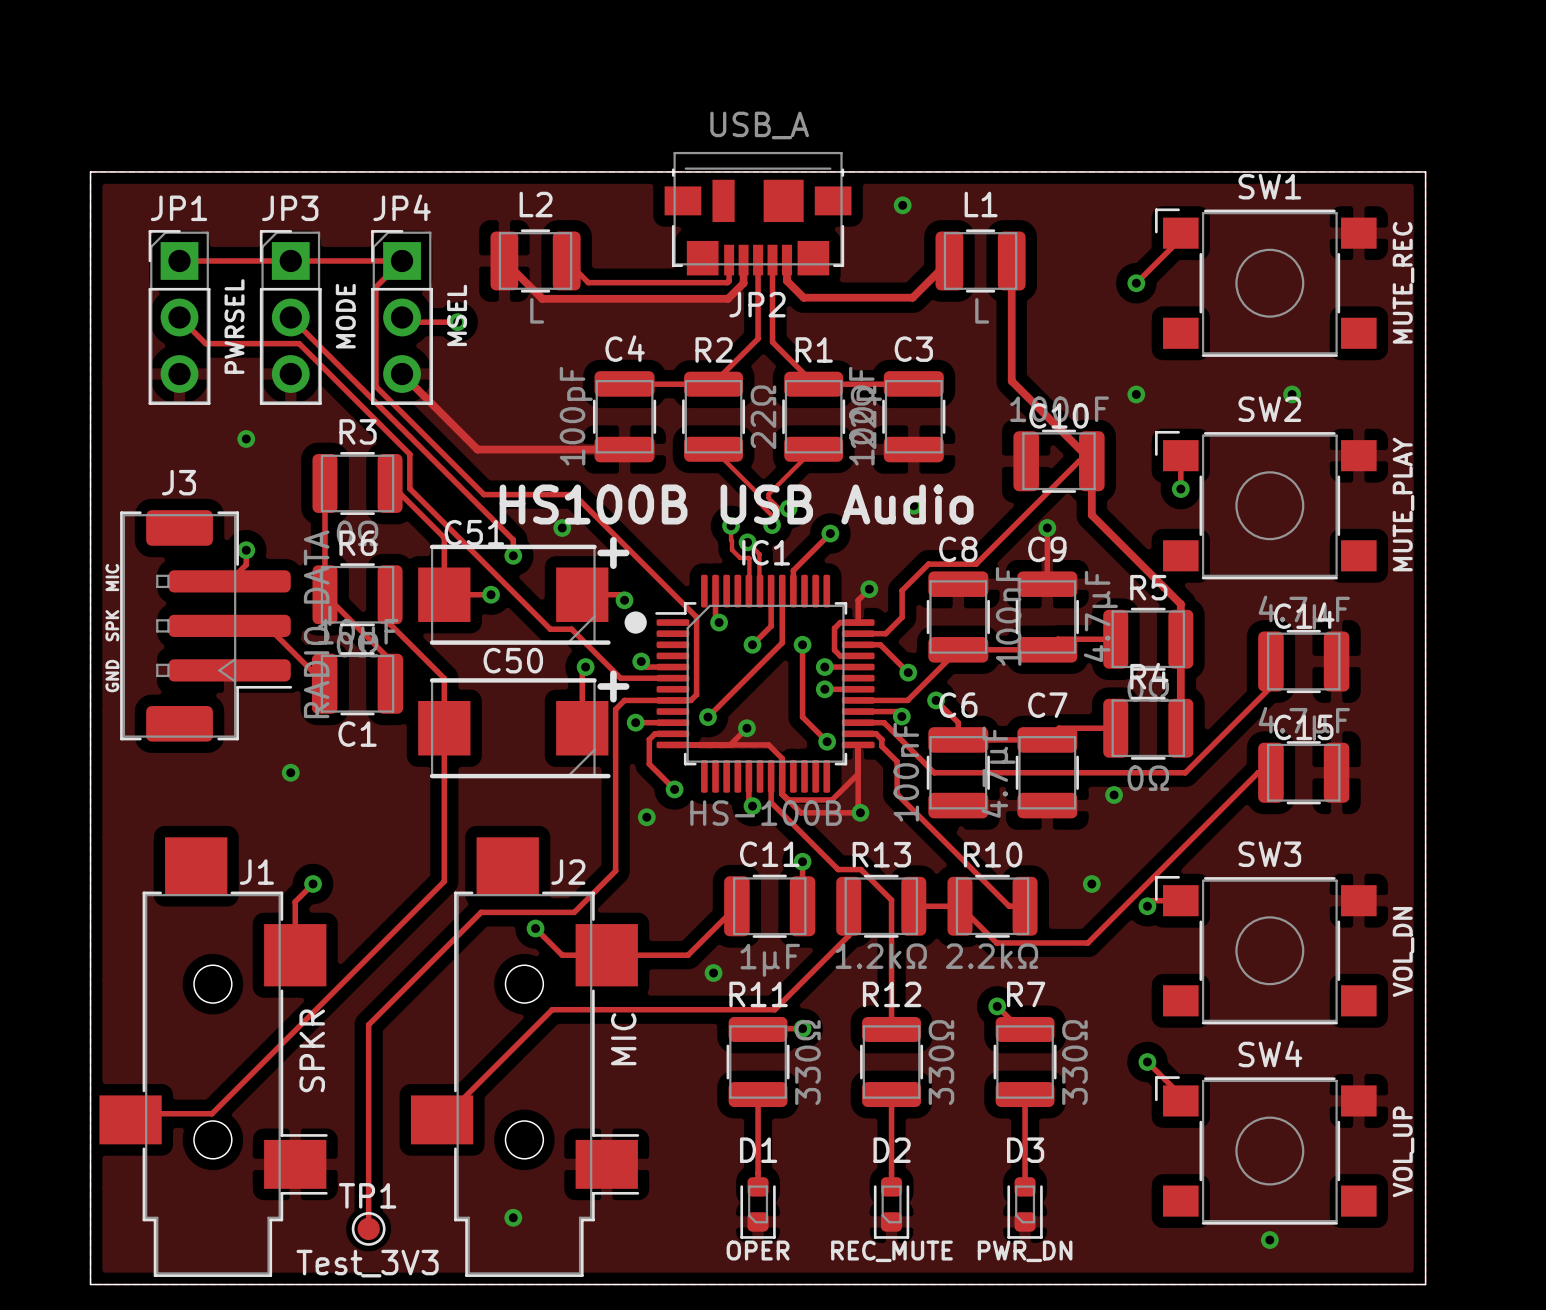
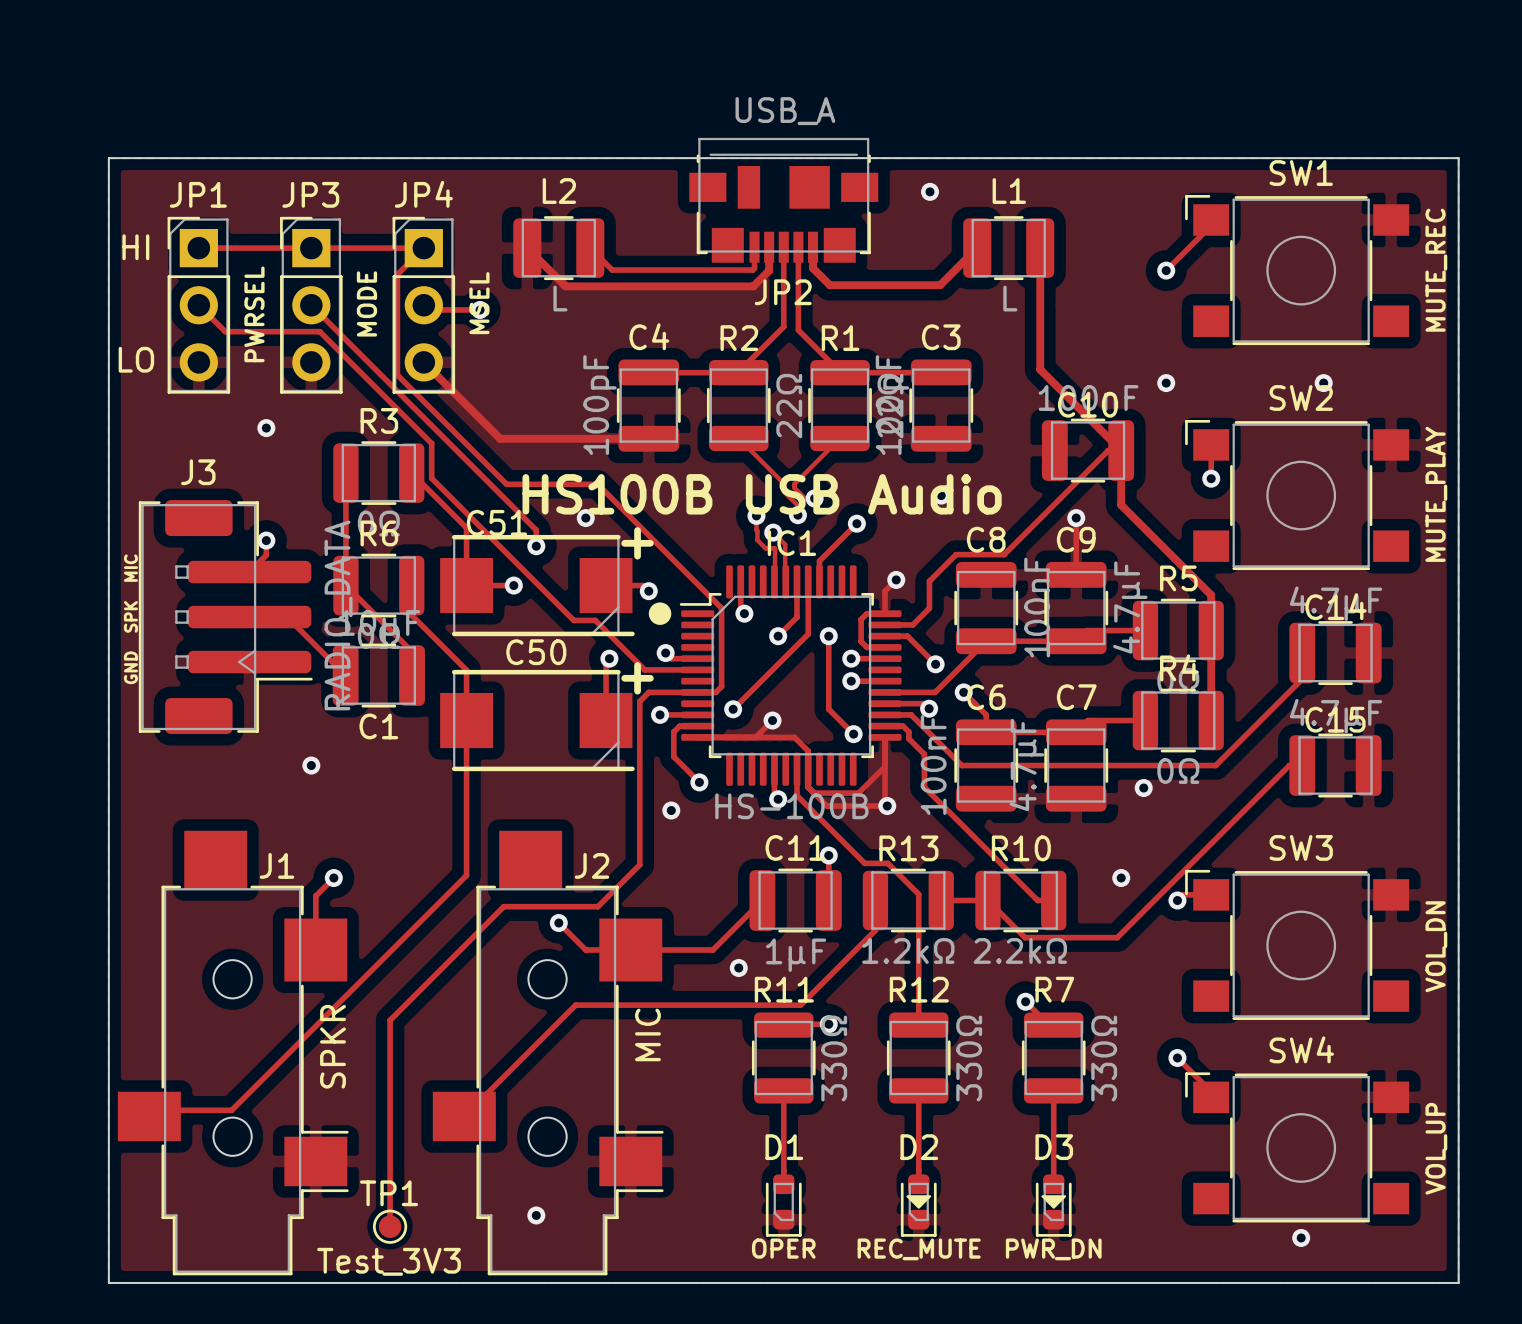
text: none -> HI (135, 247)
text: none -> LO (136, 359)
D2 footprint: [873, 1177, 910, 1239] -> [900, 1174, 937, 1237]
D3 footprint: [1007, 1177, 1043, 1239] -> [1035, 1174, 1072, 1237]

